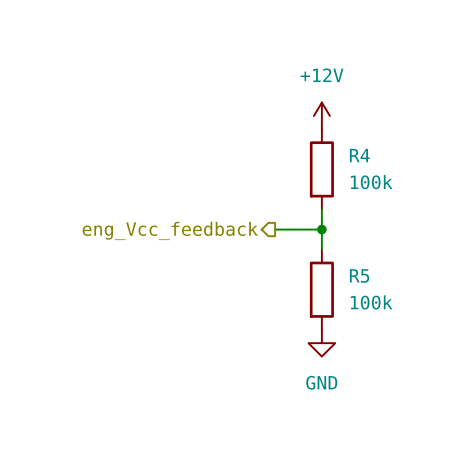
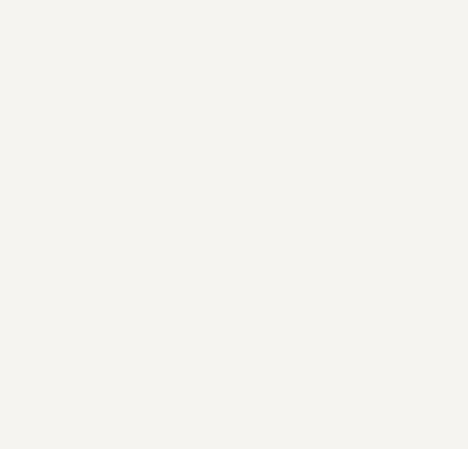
power symbol: +12V (321, 115) -> none
R4: 100k (321, 169) -> none
wire: (321, 209) (321, 249) -> none
wire: (275, 229) (321, 229) -> none
junction: (321, 229) -> none
hierarchical label: eng_Vcc_feedback (170, 230) -> none
R5: 100k (321, 289) -> none
power symbol: GND (321, 343) -> none

